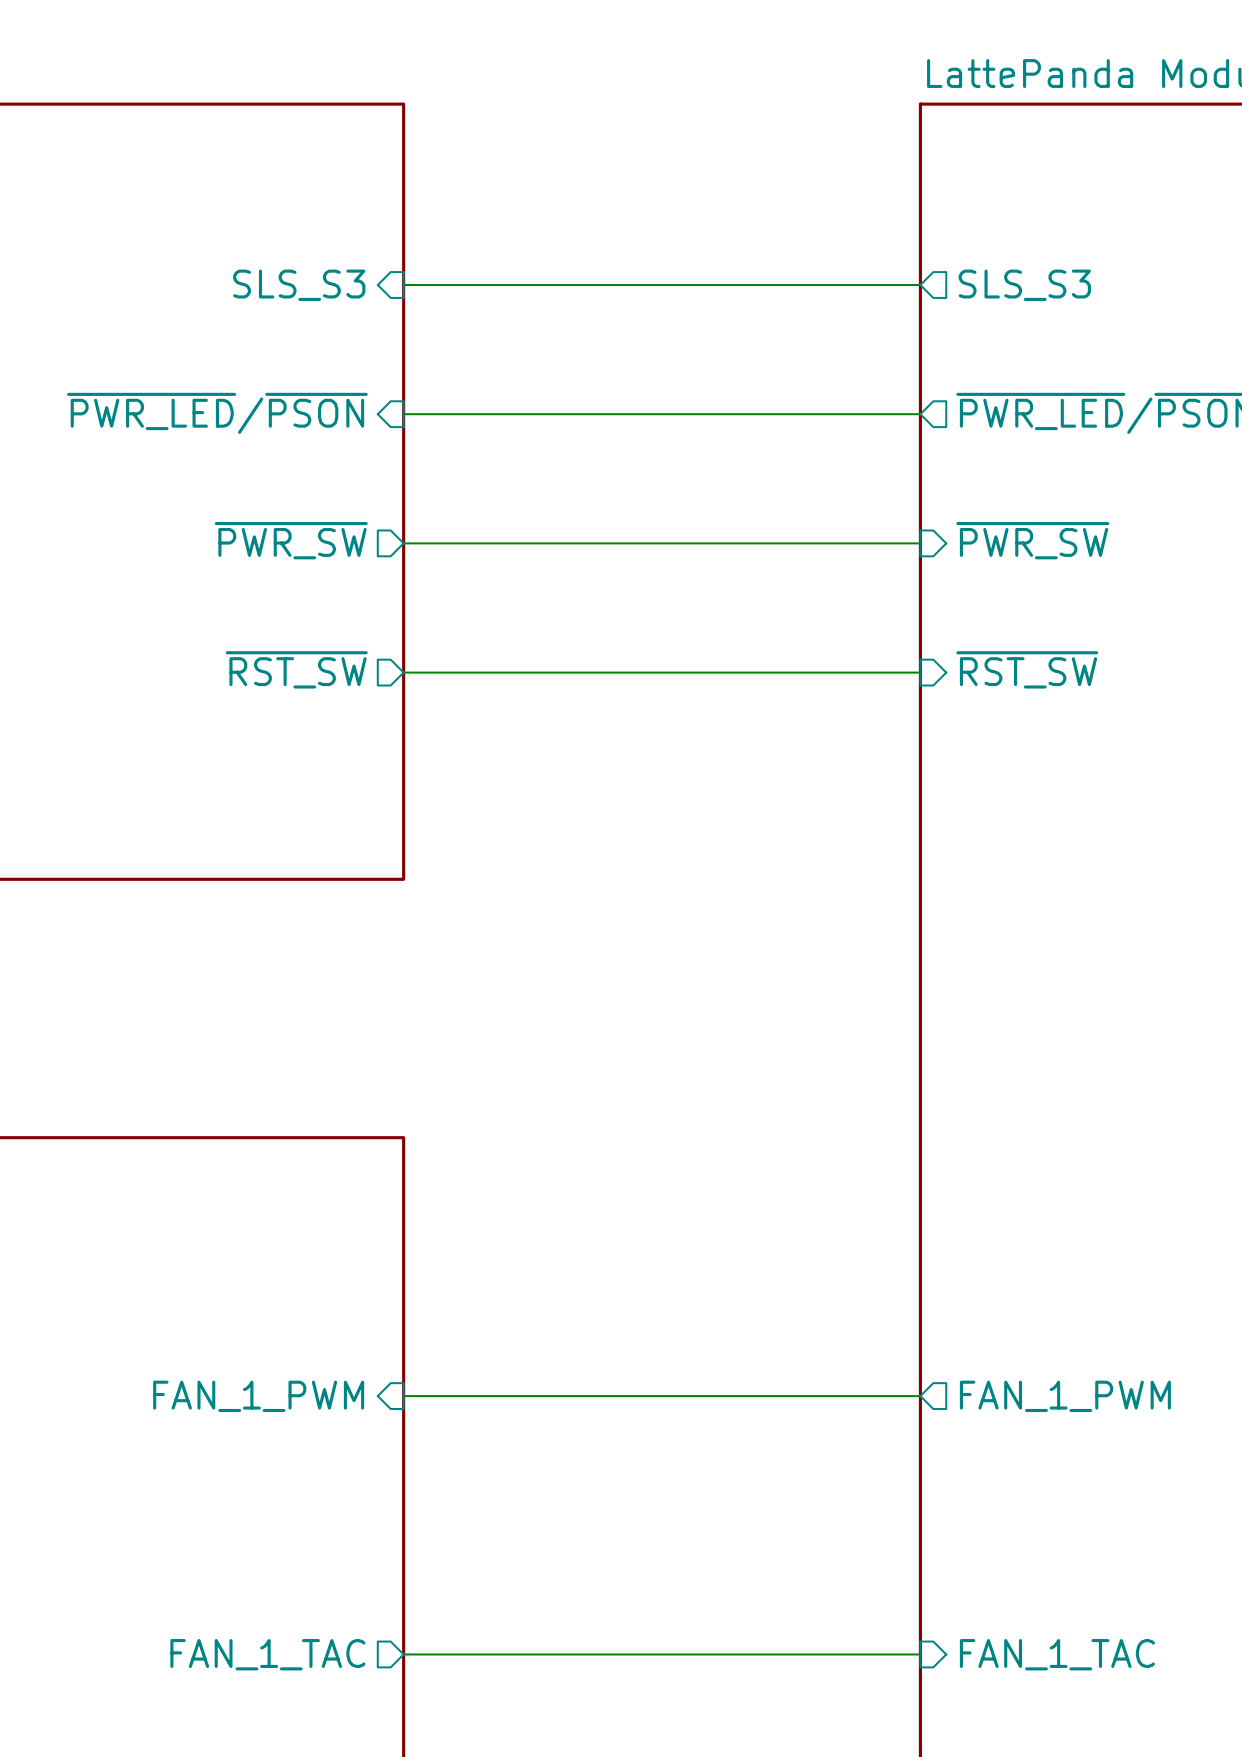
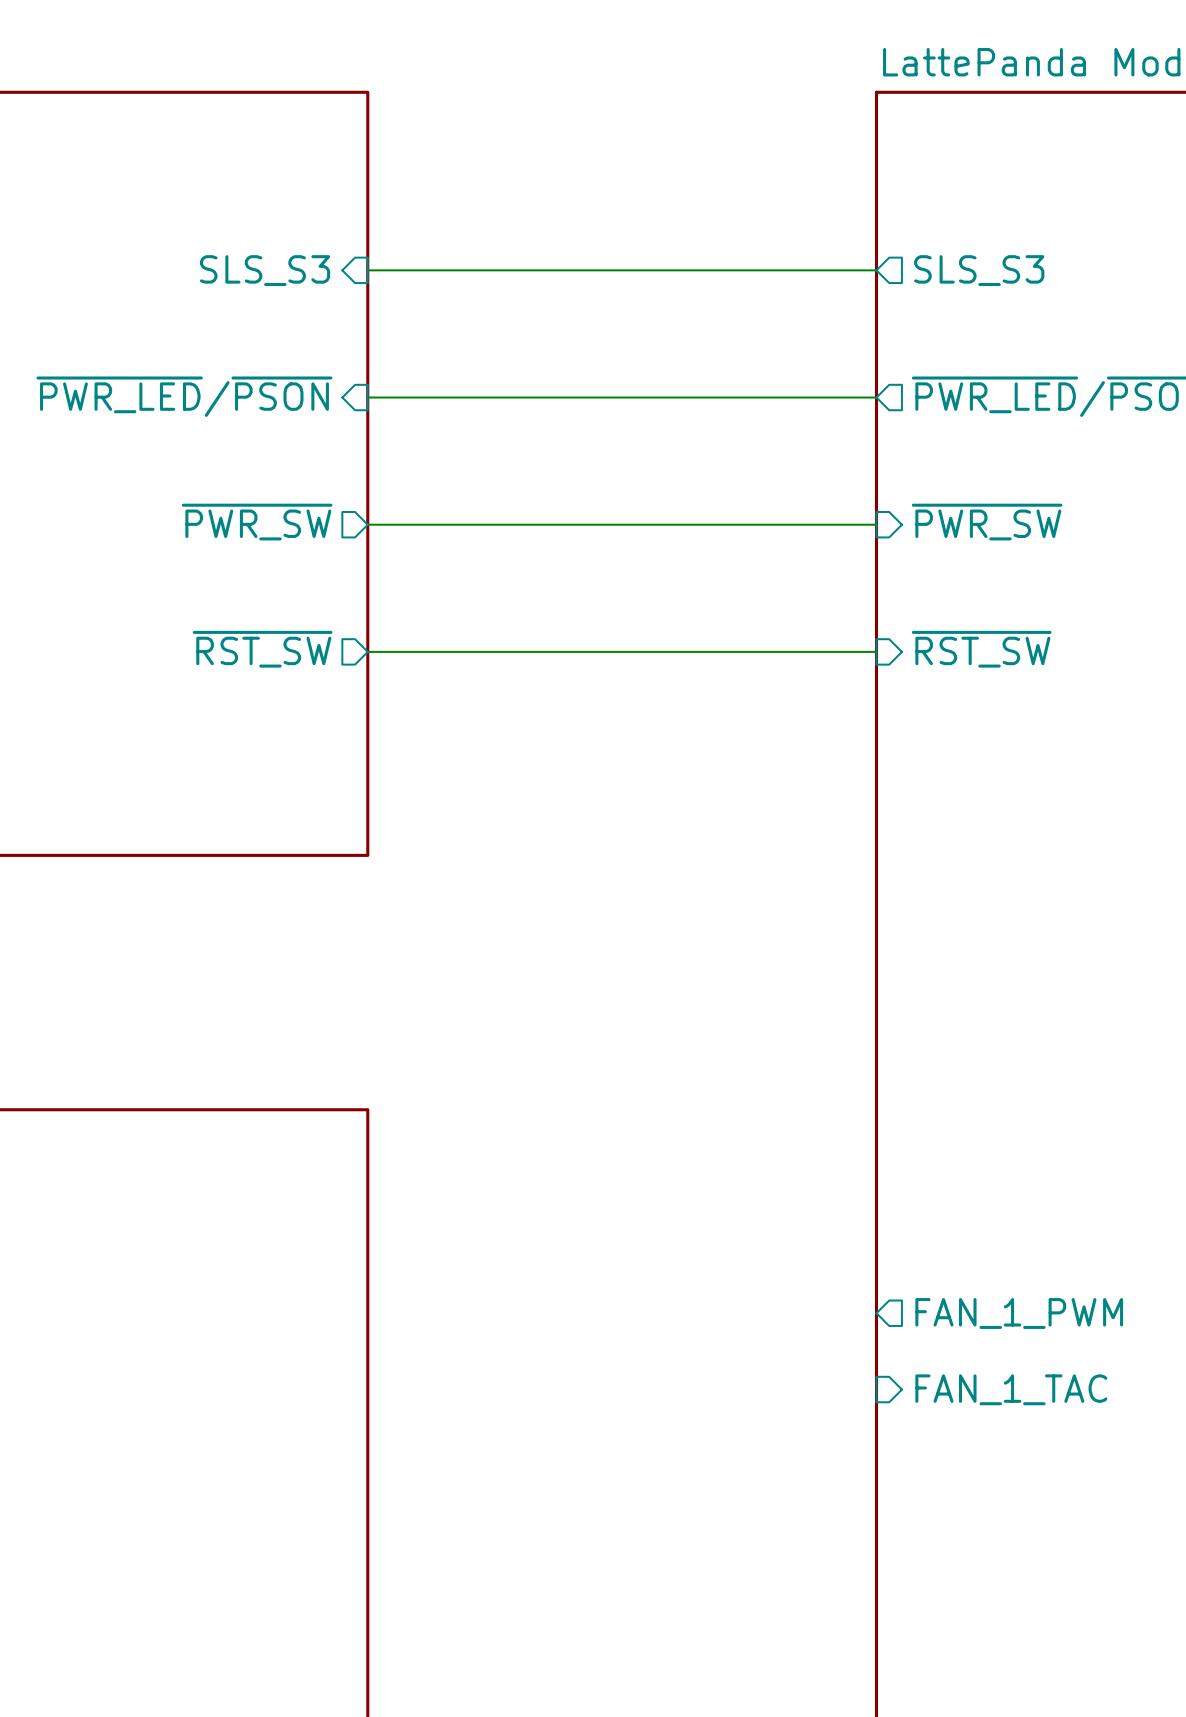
sheet pin: FAN_1_PWM (258, 1396) -> none
wire: (403, 1396) (920, 1396) -> none
sheet pin position: FAN_1_PWM (1065, 1396) -> FAN_1_PWM (1019, 1313)
sheet pin: FAN_1_TAC (267, 1654) -> none
wire: (403, 1654) (920, 1654) -> none
sheet pin position: FAN_1_TAC (1057, 1654) -> FAN_1_TAC (1011, 1389)

